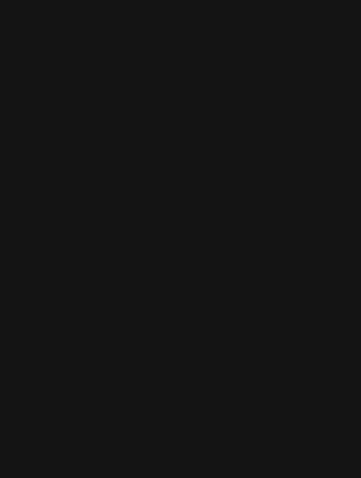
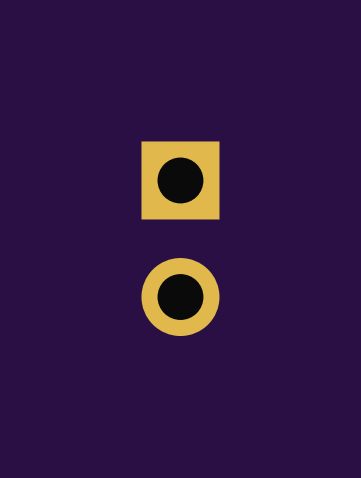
part: none -> (180, 238)

